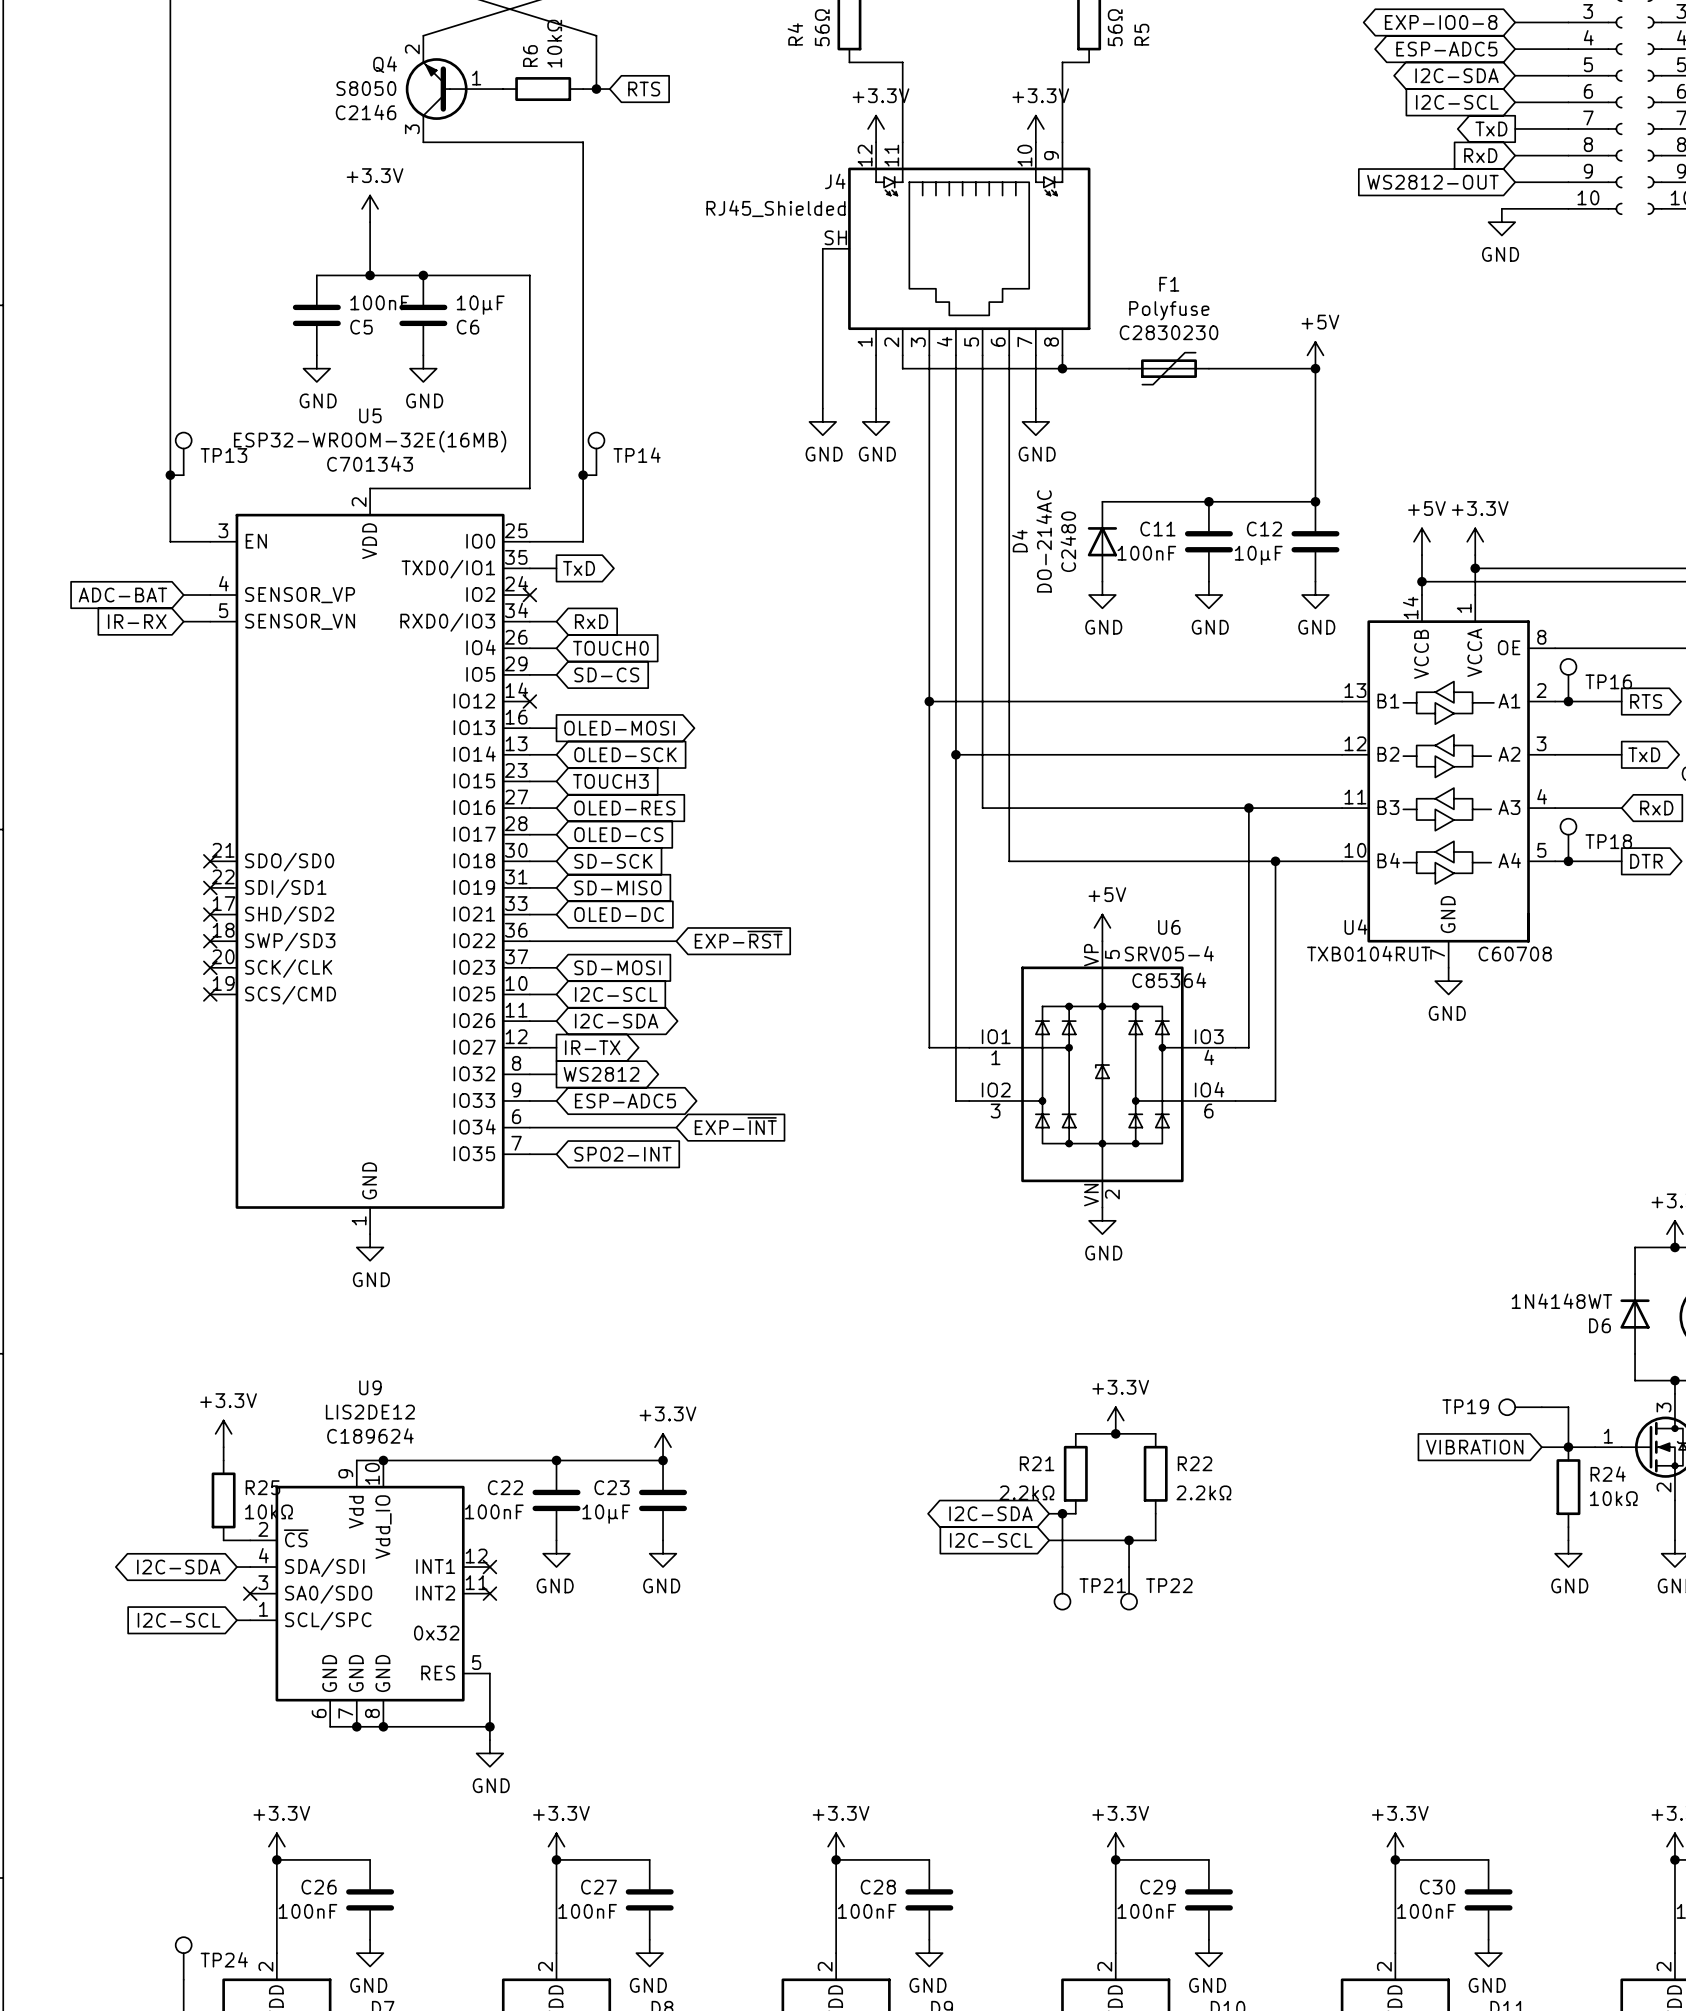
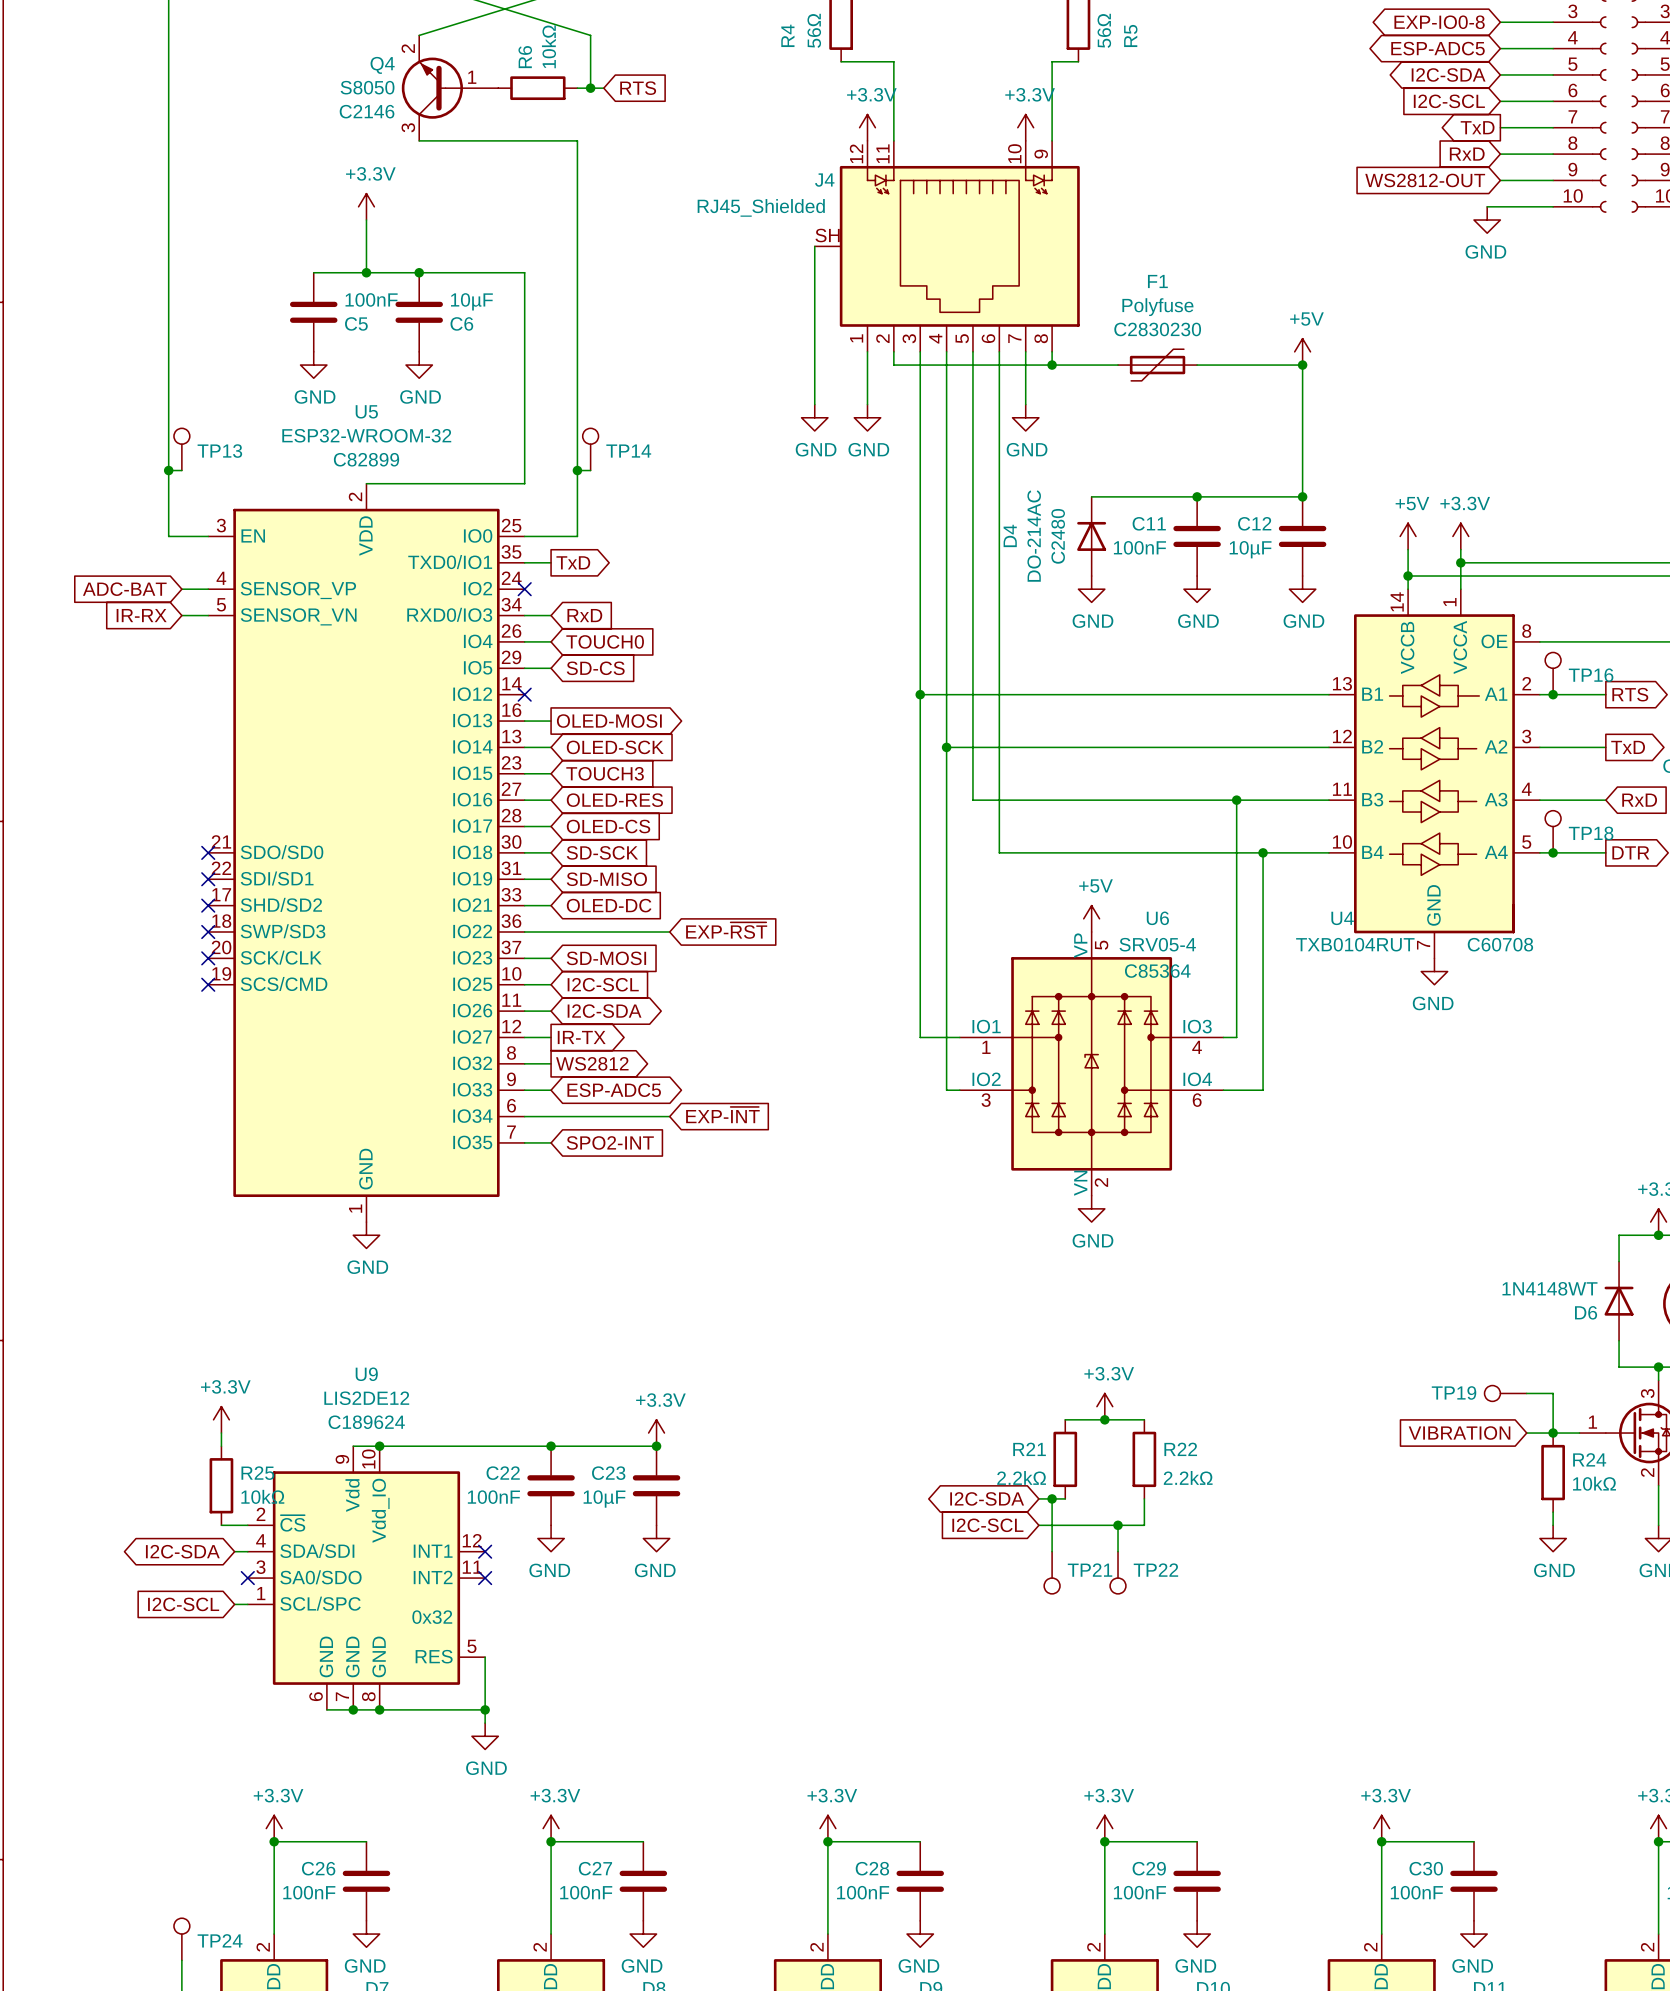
U5 value: ESP32-WROOM-32E(16MB) (370, 441) -> ESP32-WROOM-32 (366, 435)
U5 text: C701343 (370, 463) -> C82899 (366, 459)

